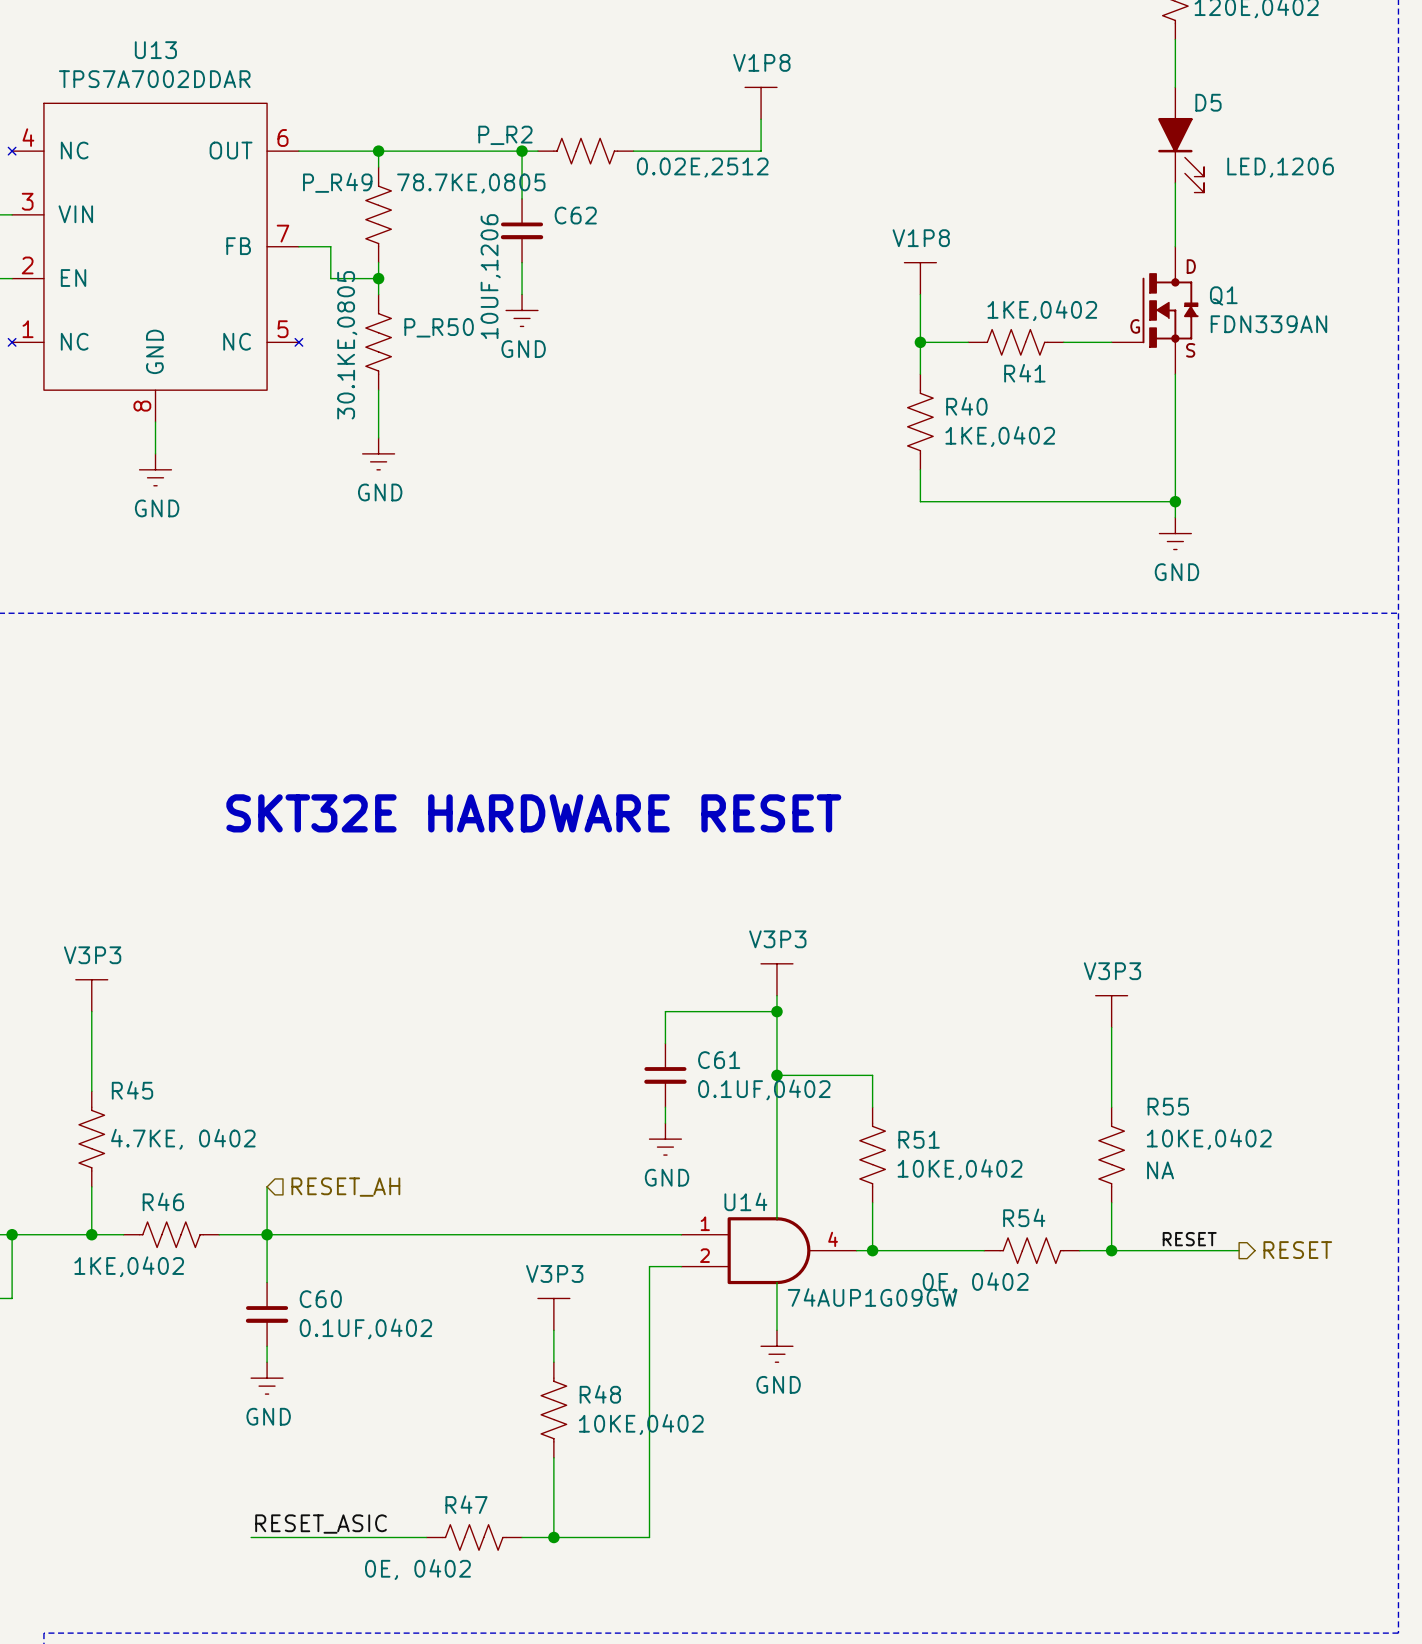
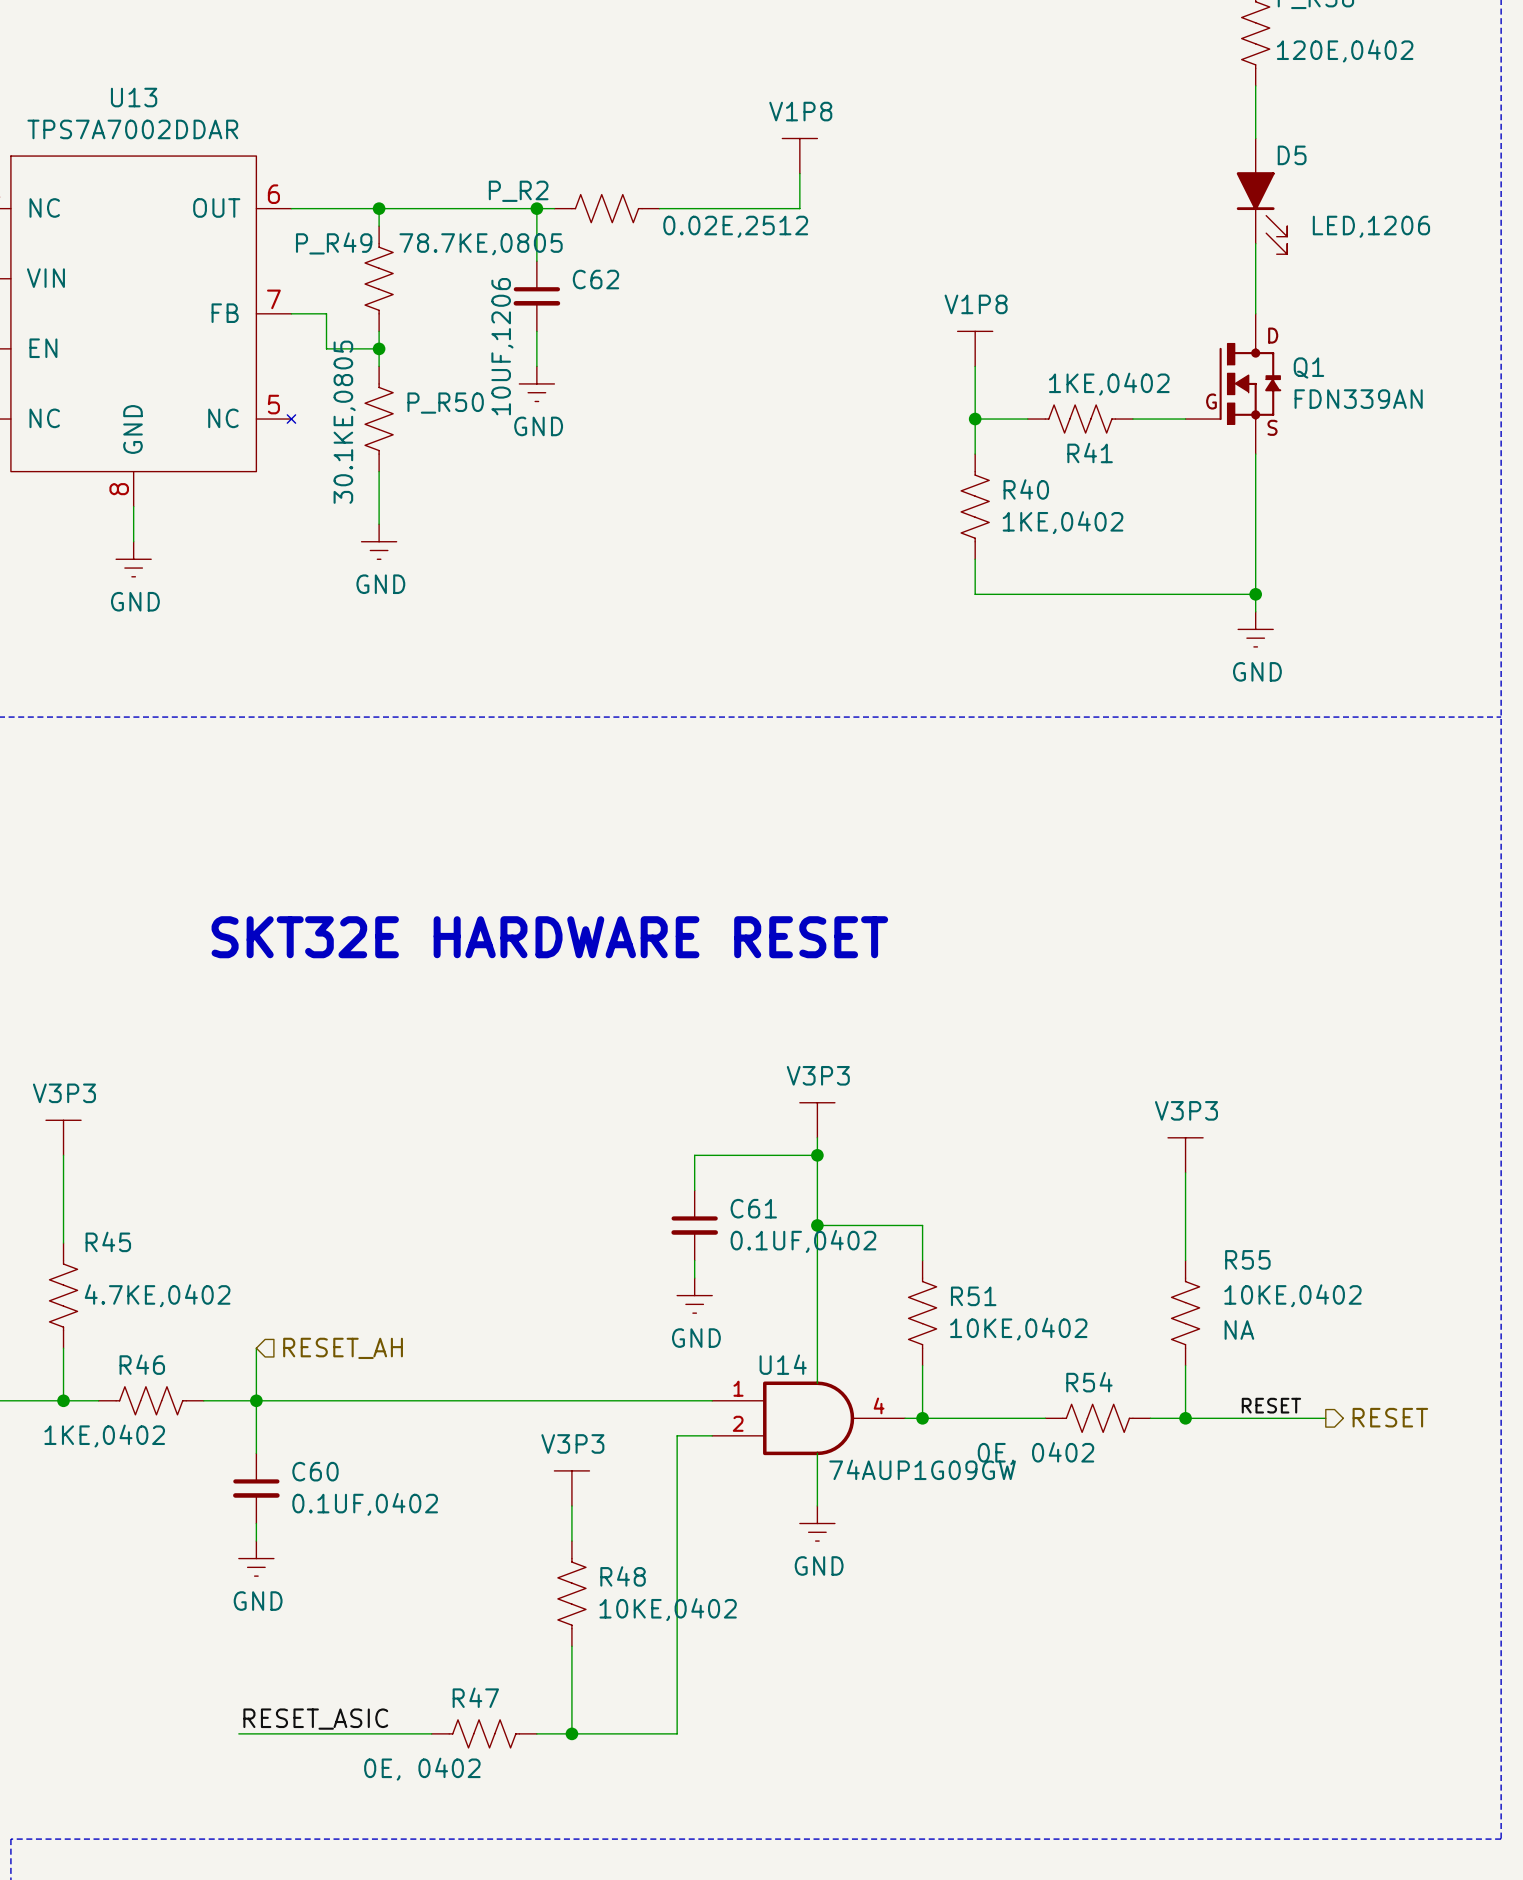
R45 value: 4.7KE, 0402 (183, 1139) -> 4.7KE,0402 (157, 1295)

